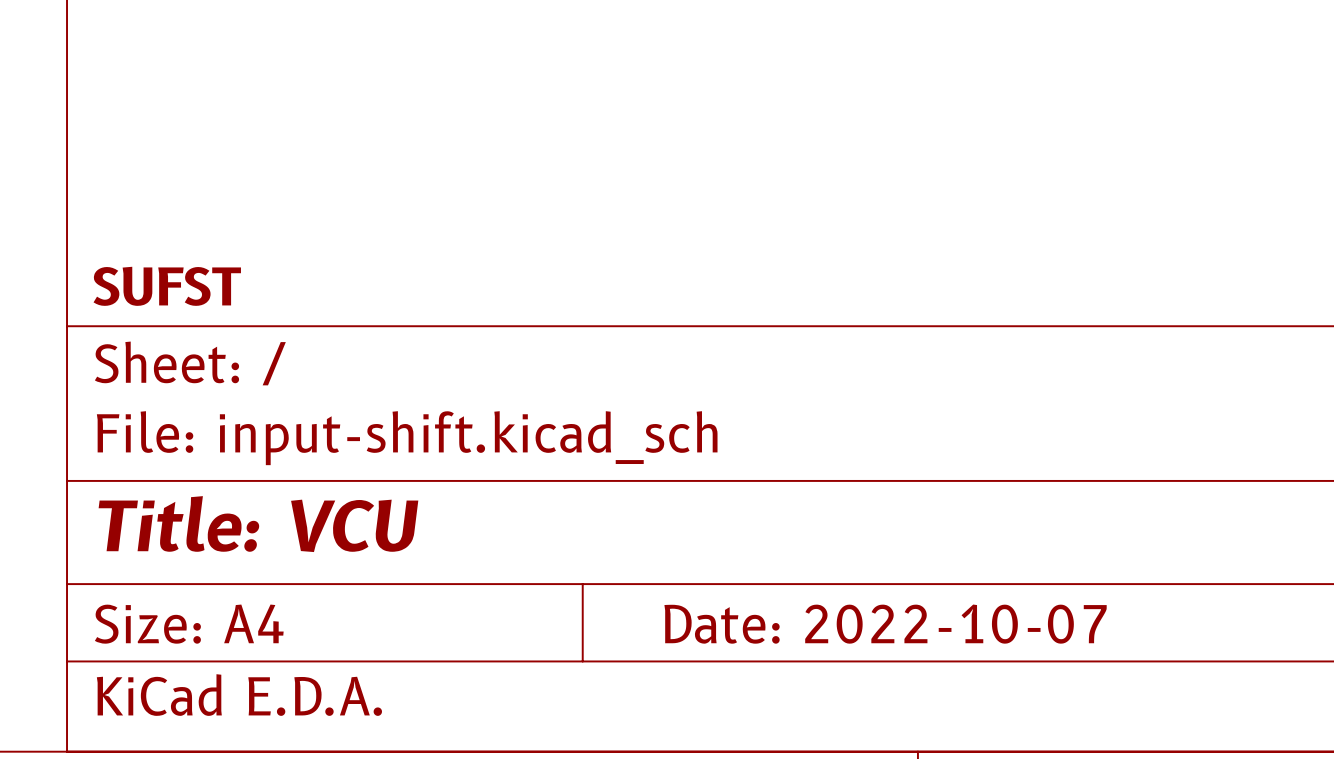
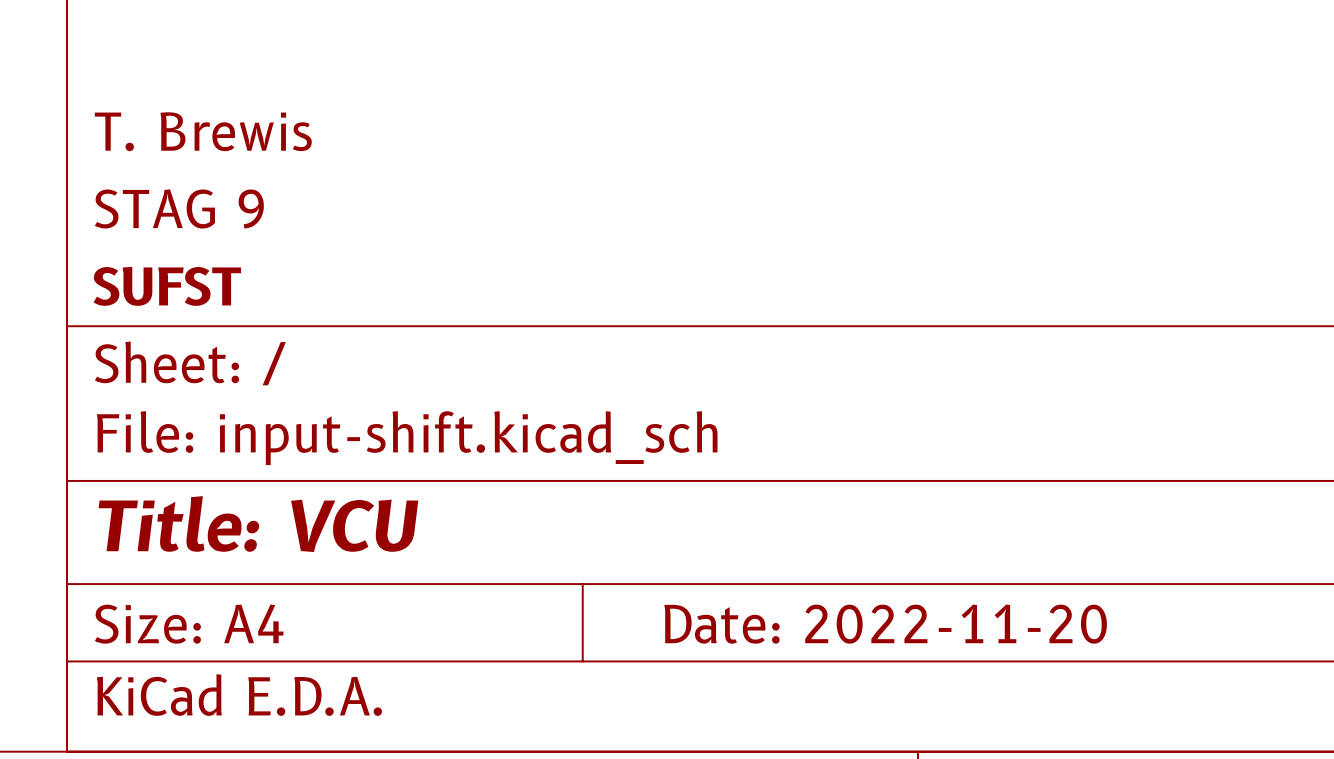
title block: none -> T. Brewis (203, 131)
title block: none -> STAG 9 (179, 208)
title block: Date: 2022-10-07 (885, 624) -> Date: 2022-11-20 (885, 624)

